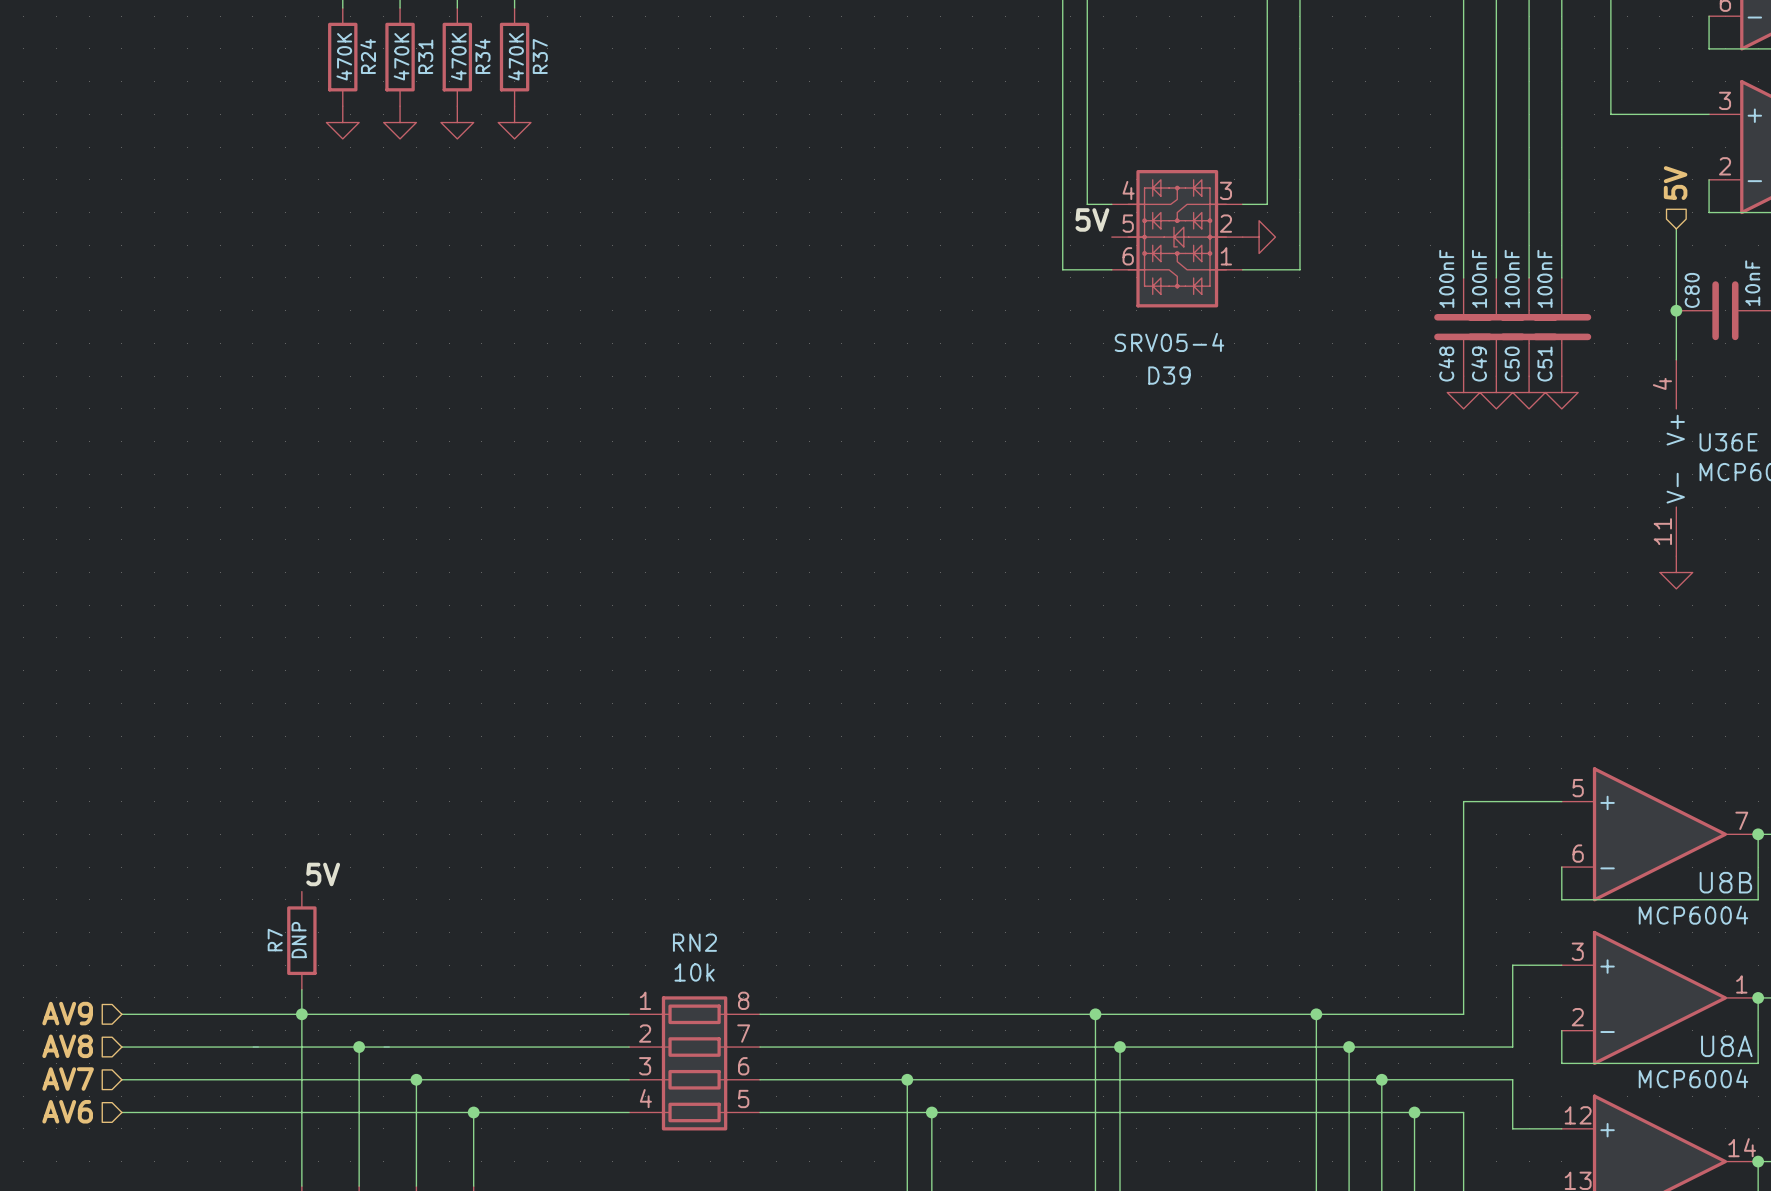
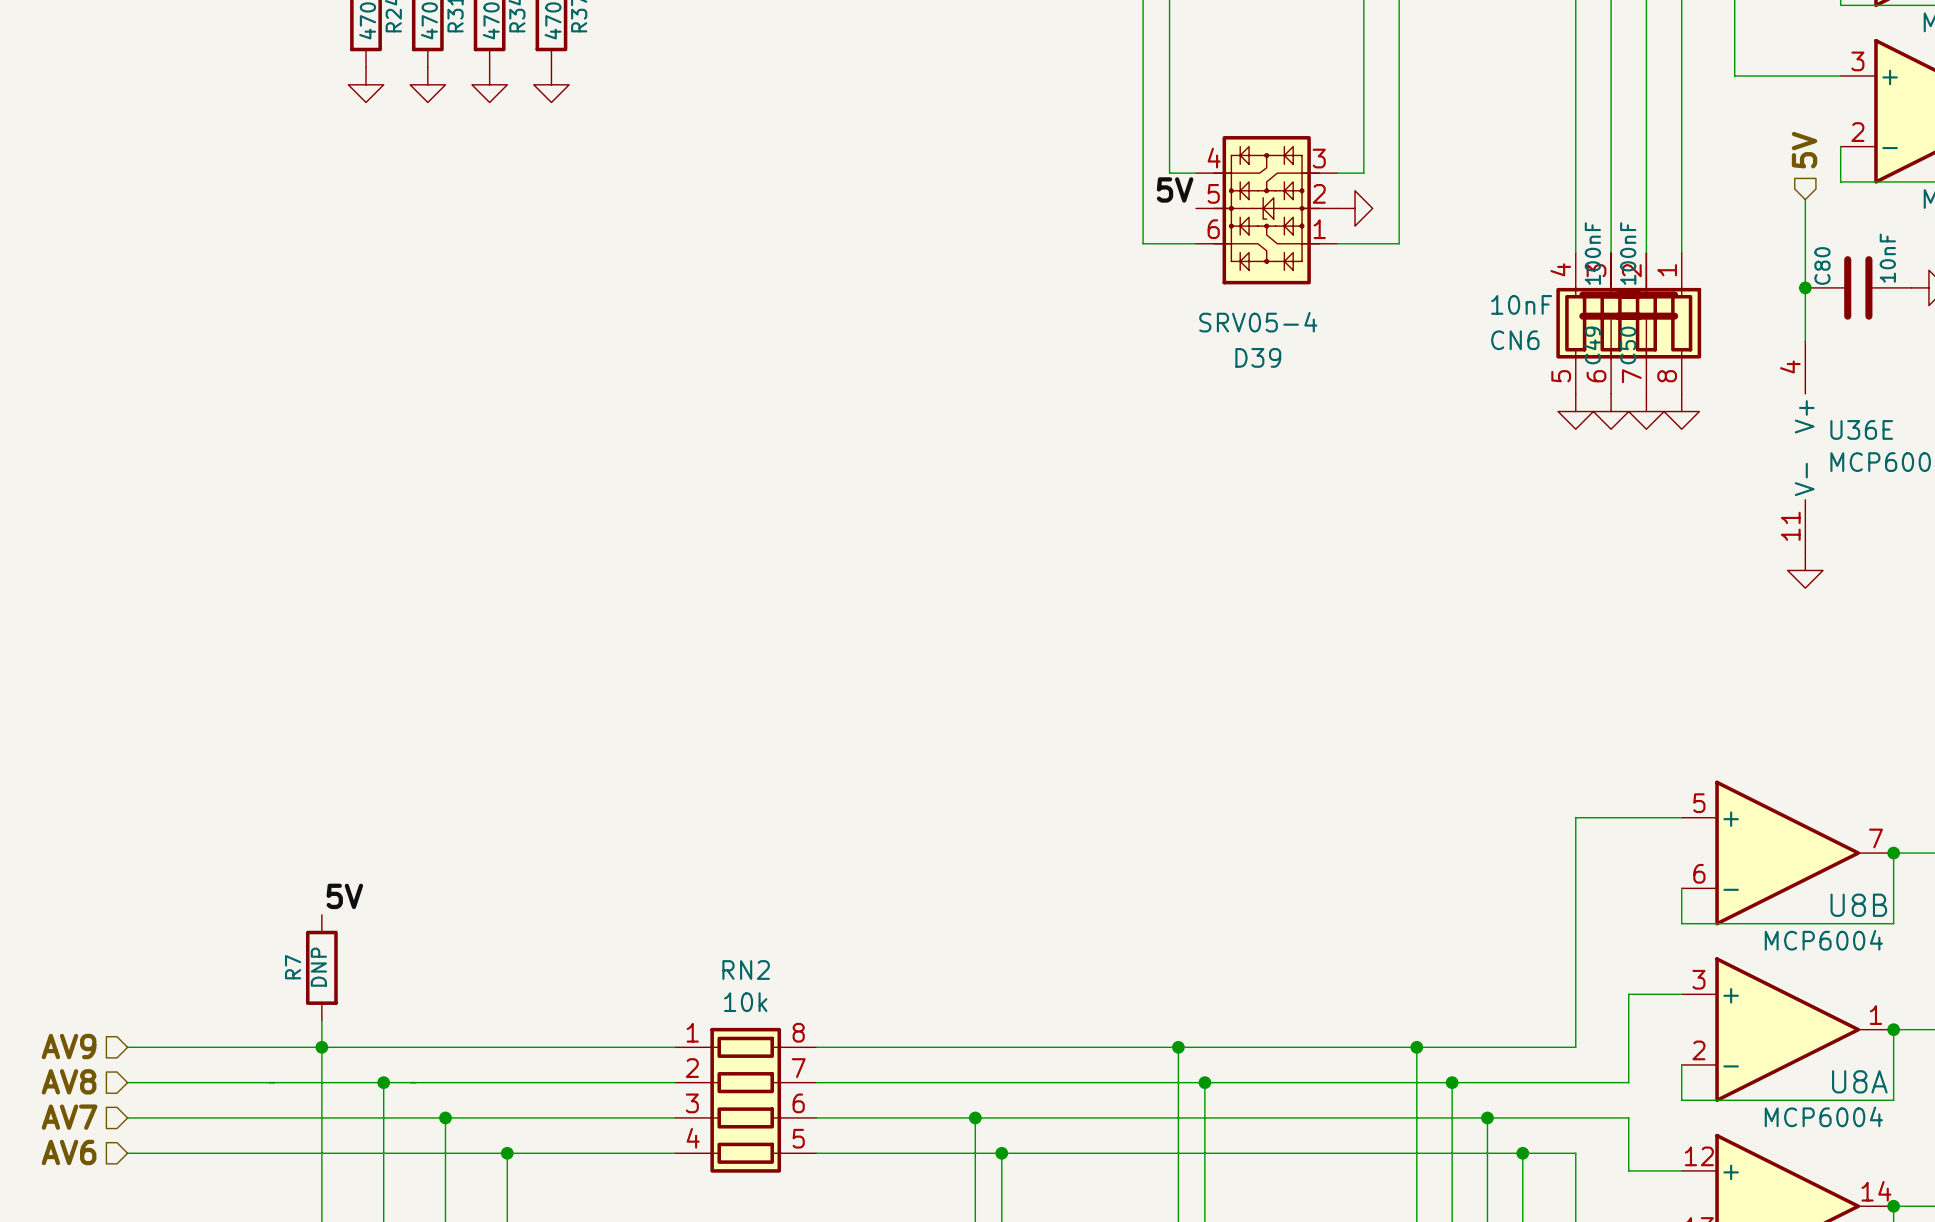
C48: 100nF (1463, 327) -> none
C51: 100nF (1561, 327) -> none
CN6: none -> 10nF (1628, 323)
power symbol: (1463, 392) -> none
power symbol: (1496, 392) -> none
power symbol: (1529, 392) -> none
power symbol: (1561, 392) -> none
power symbol: none -> (1575, 411)
power symbol: none -> (1611, 411)
power symbol: none -> (1646, 411)
power symbol: none -> (1681, 411)

